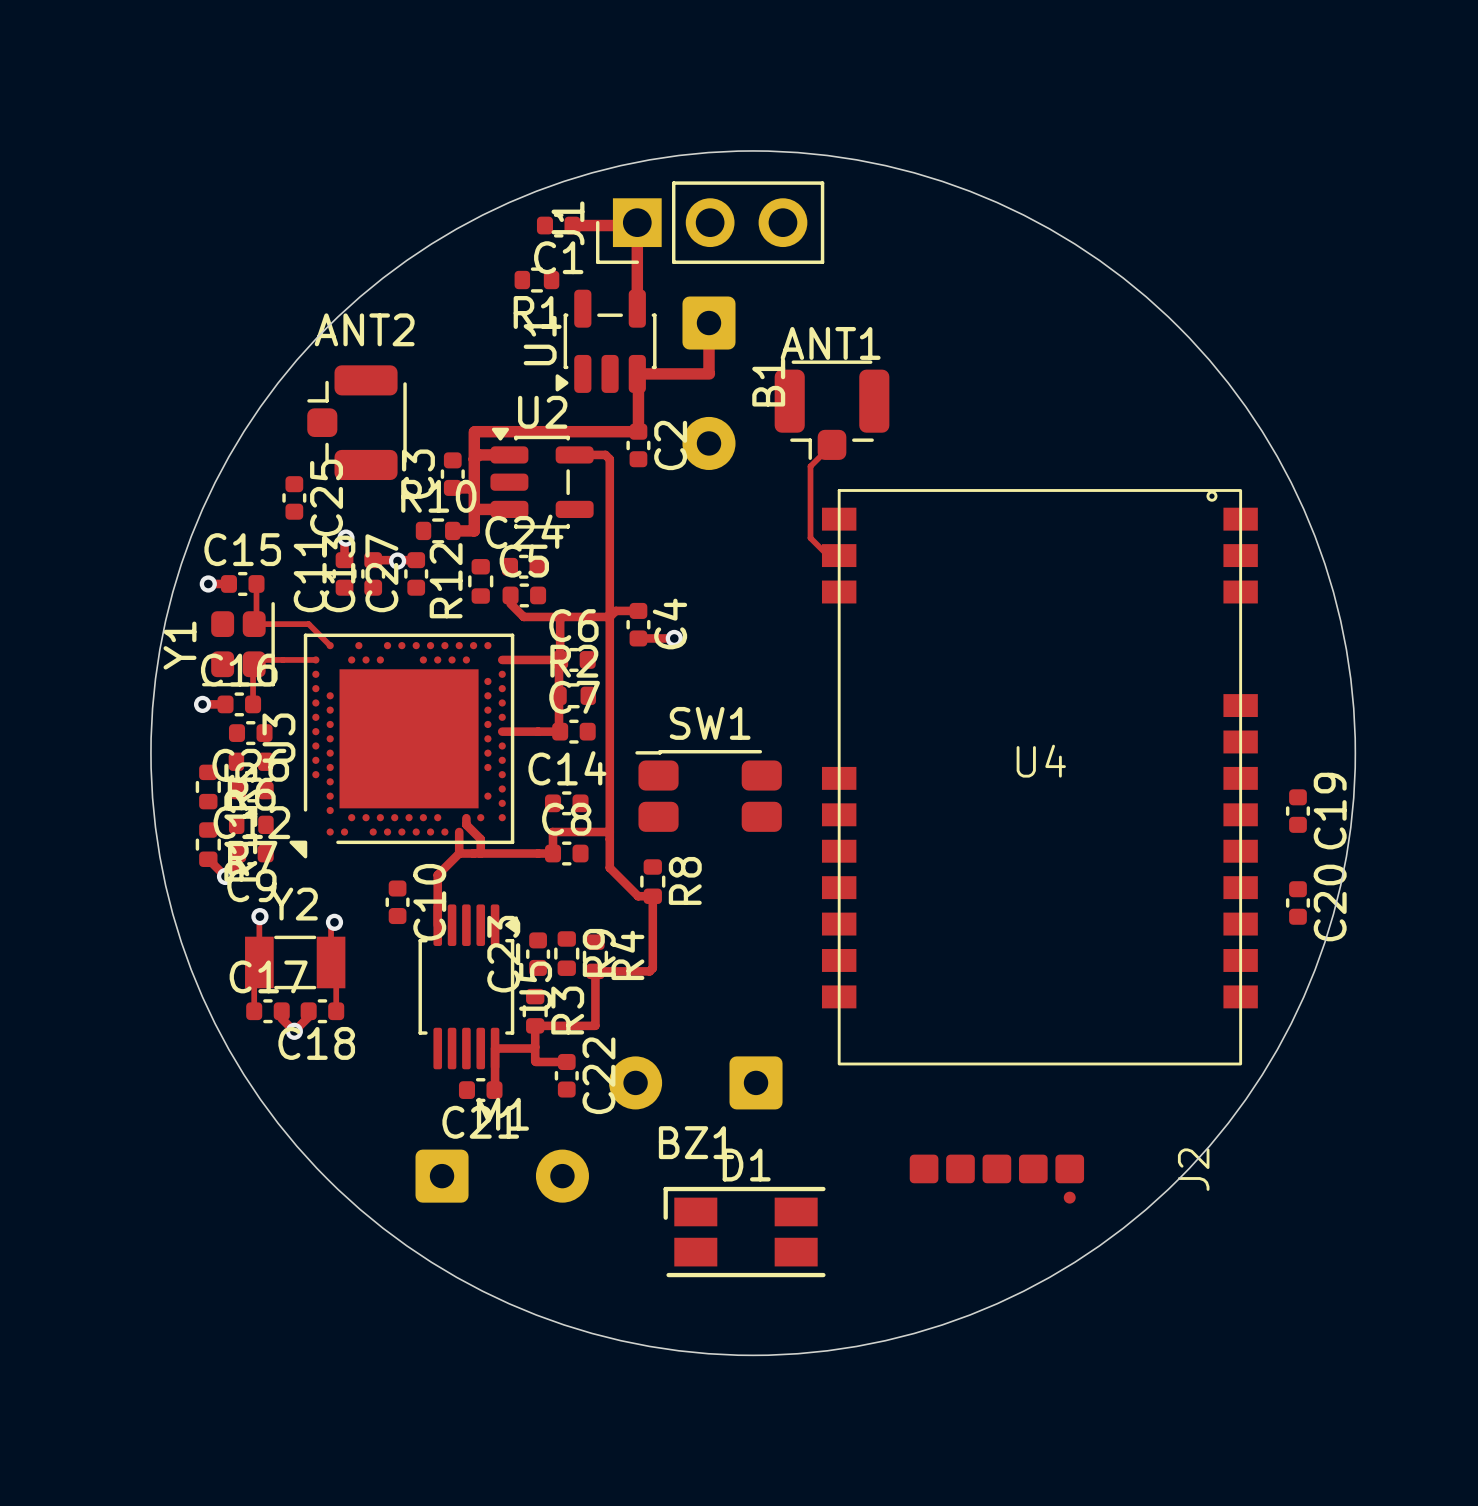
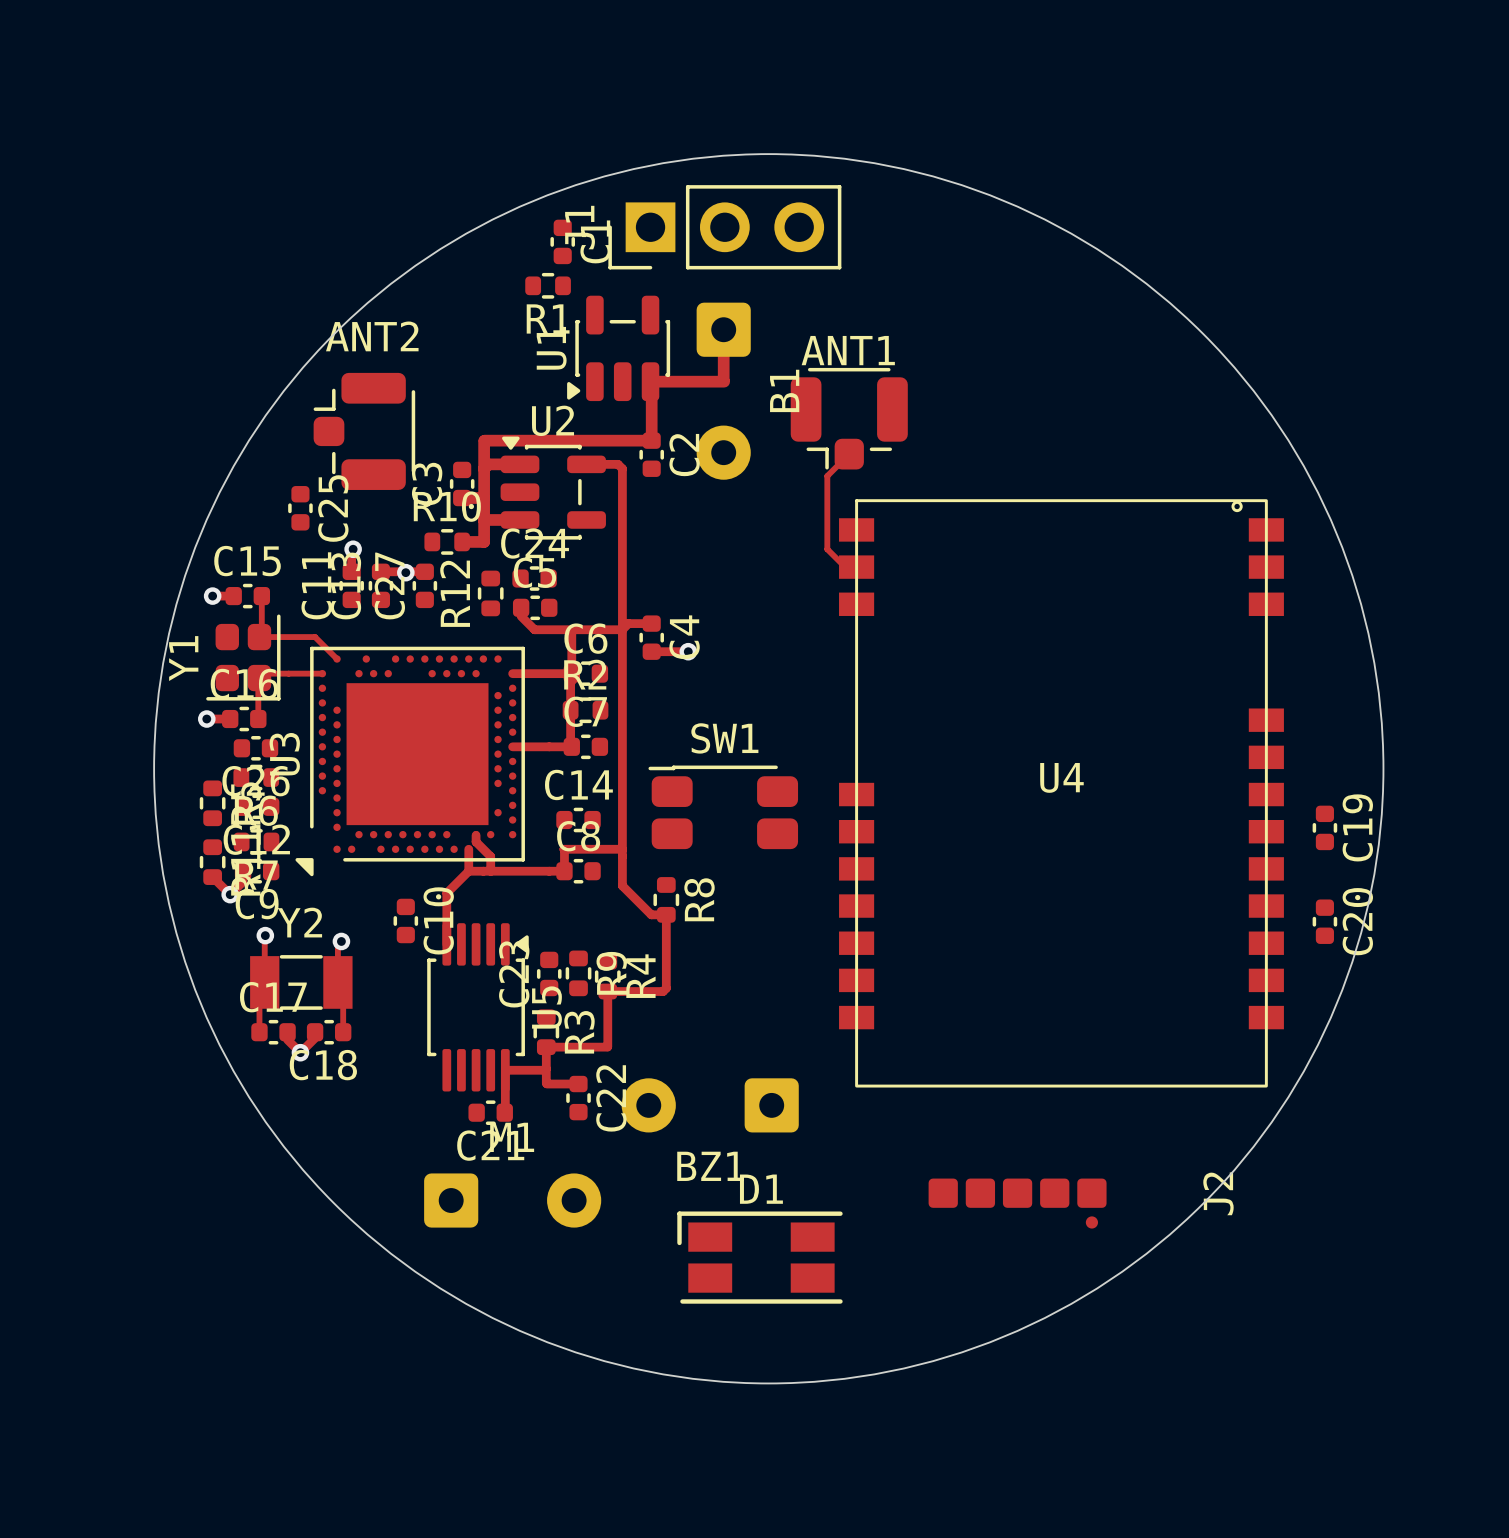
C1 rotation: 0° (558, 225) -> 90° clockwise (562, 241)
track: (572, 225) (634, 225) (637, 222) (637, 308) -> none

